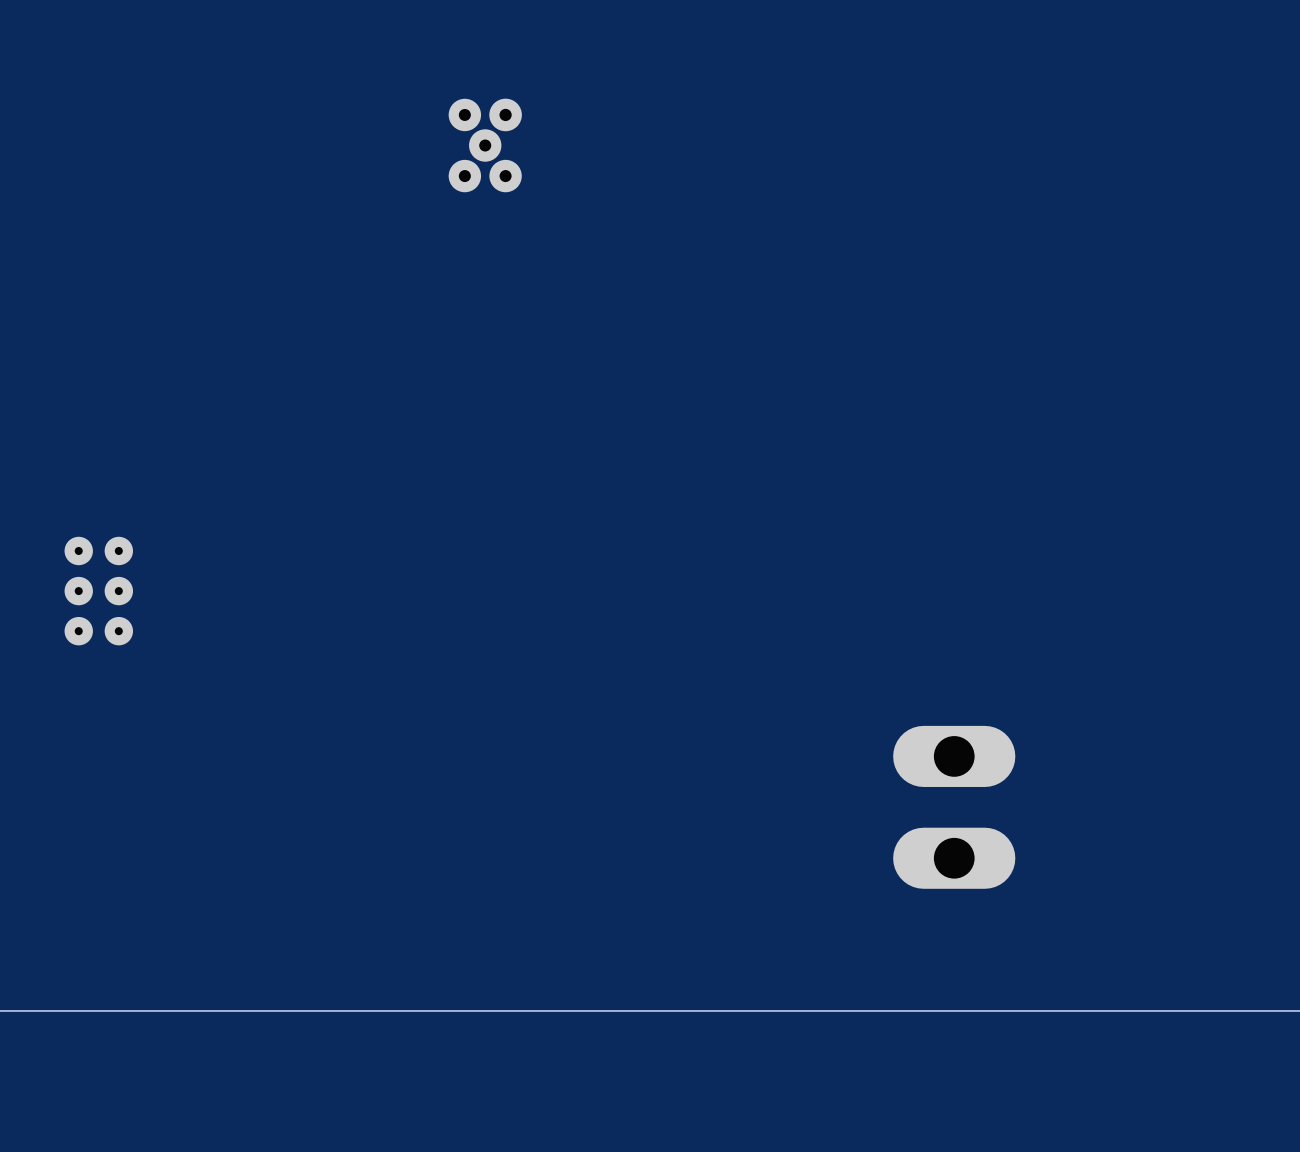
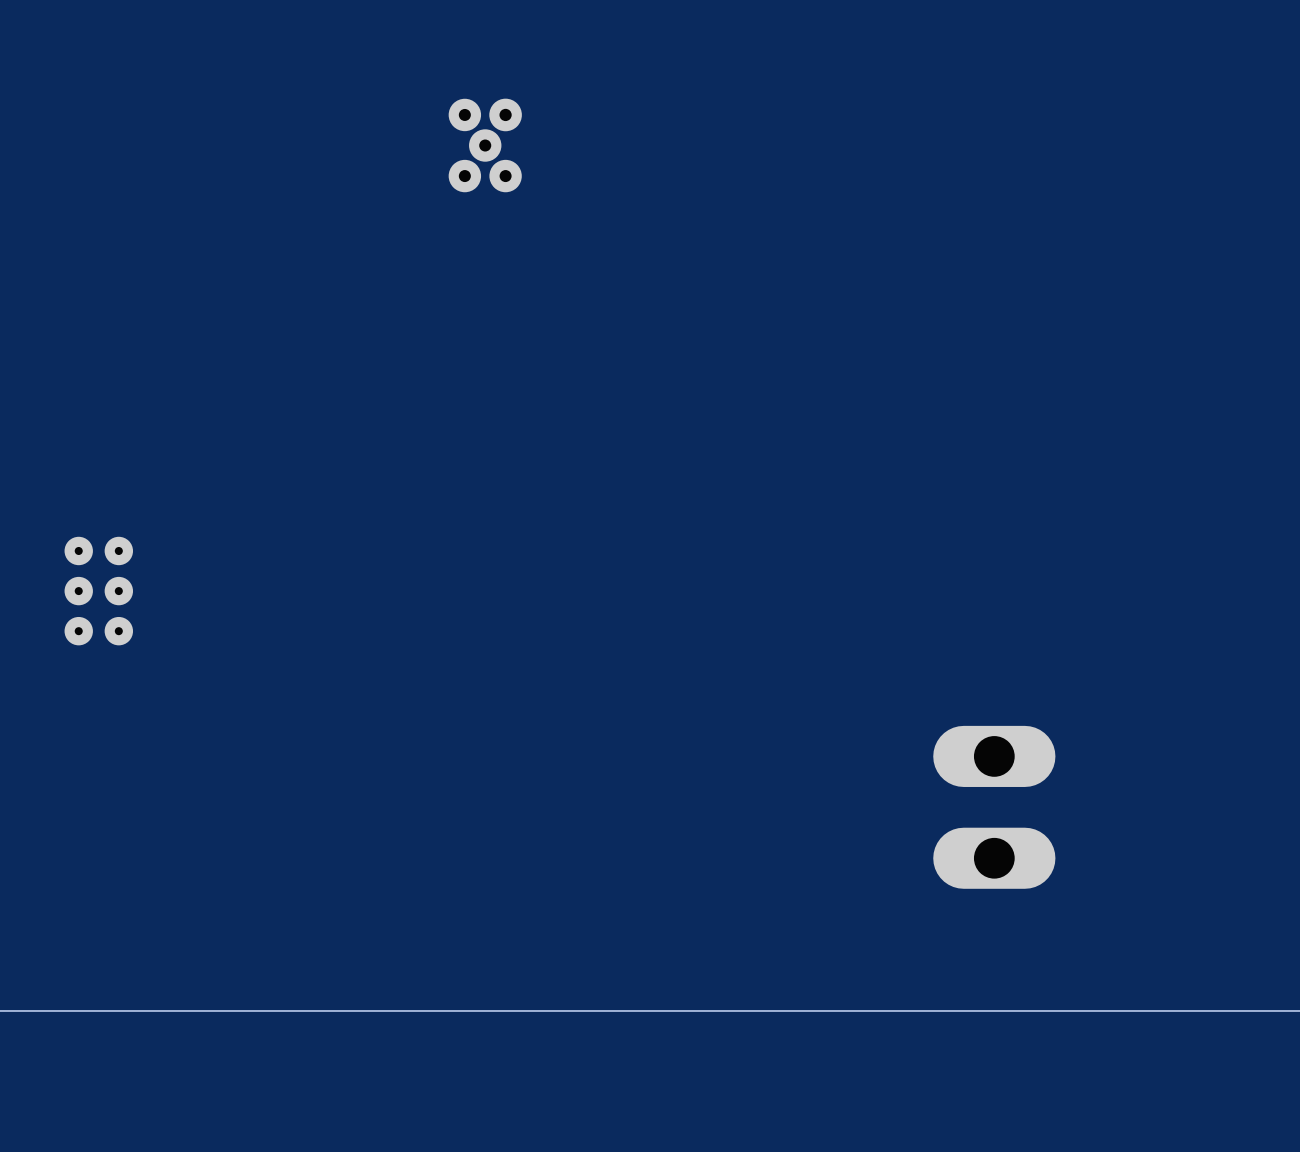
part position: (954, 807) -> (994, 807)

